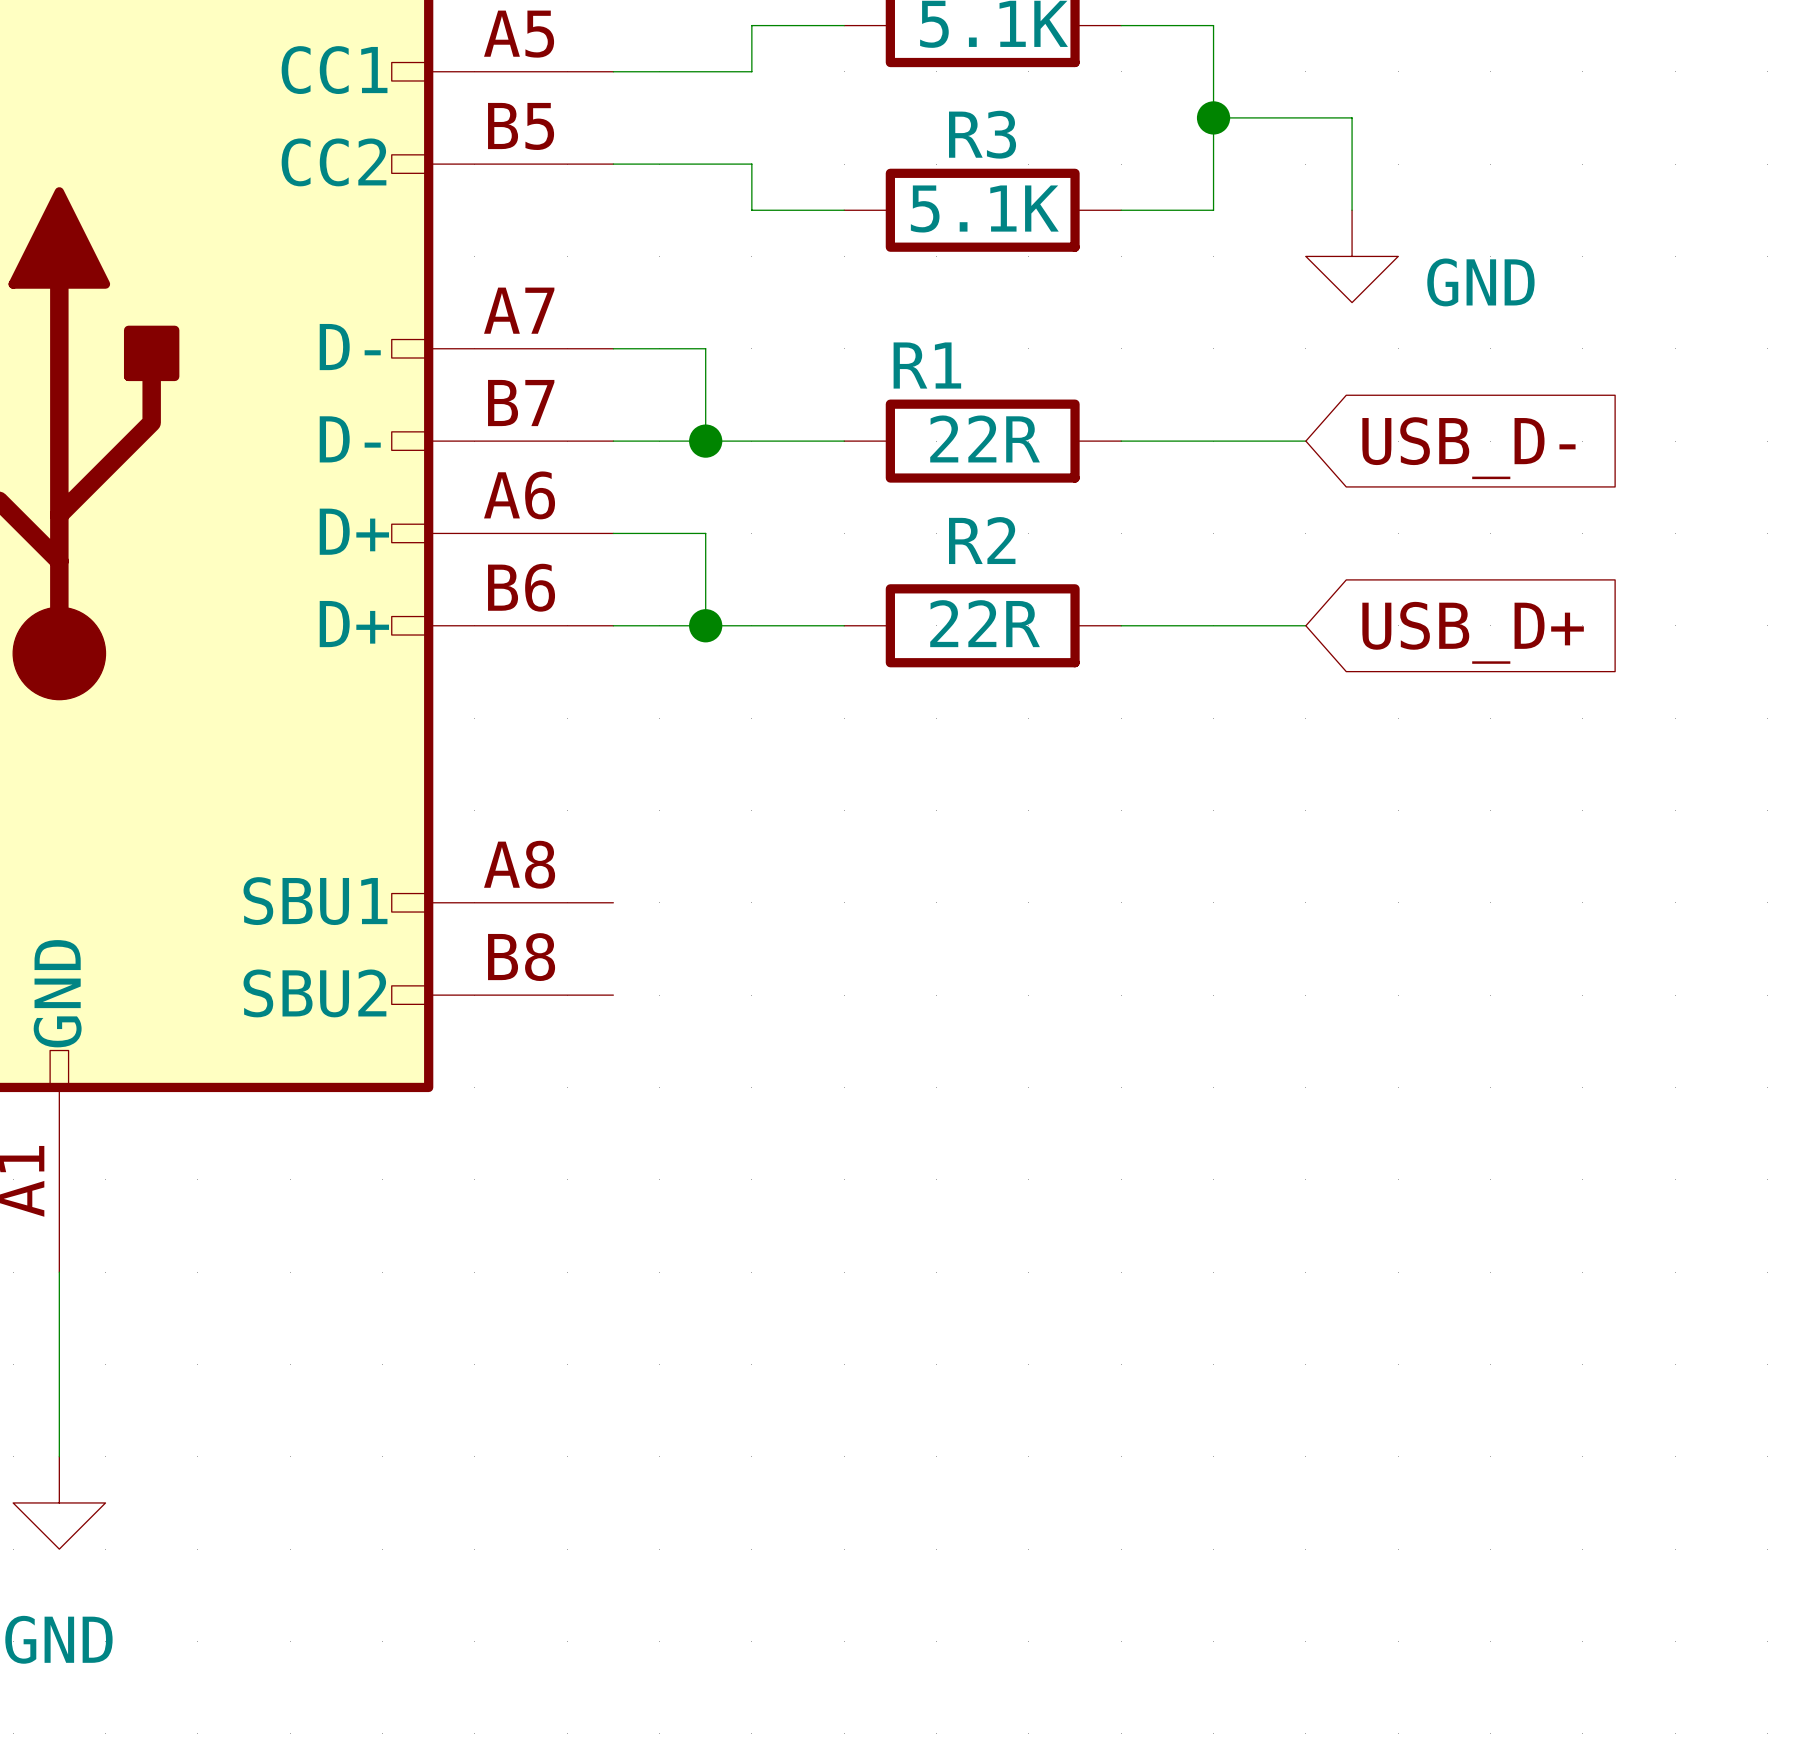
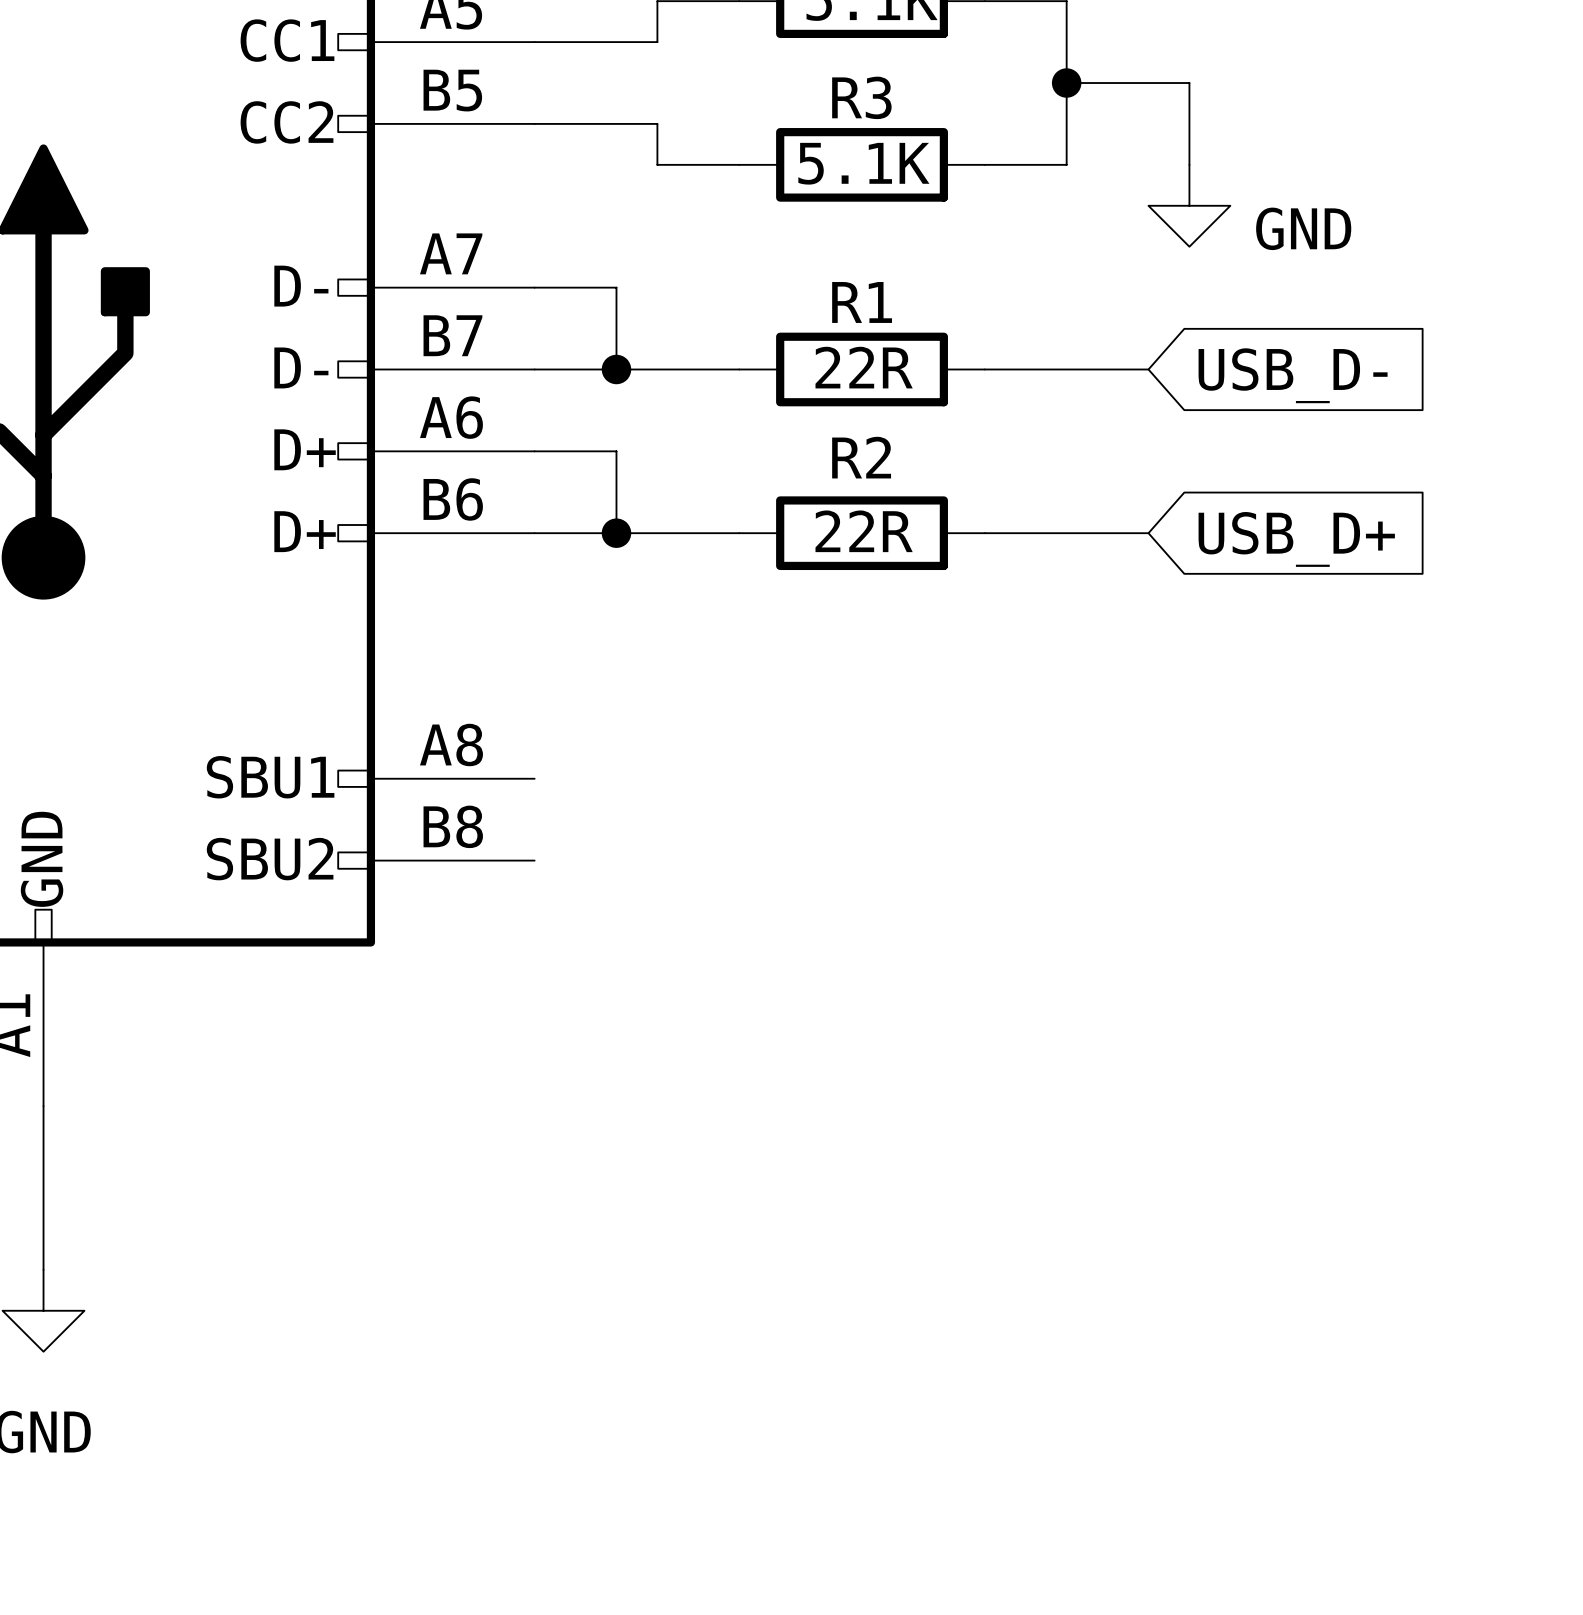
R1 name position: R1 (927, 365) -> R1 (862, 302)

